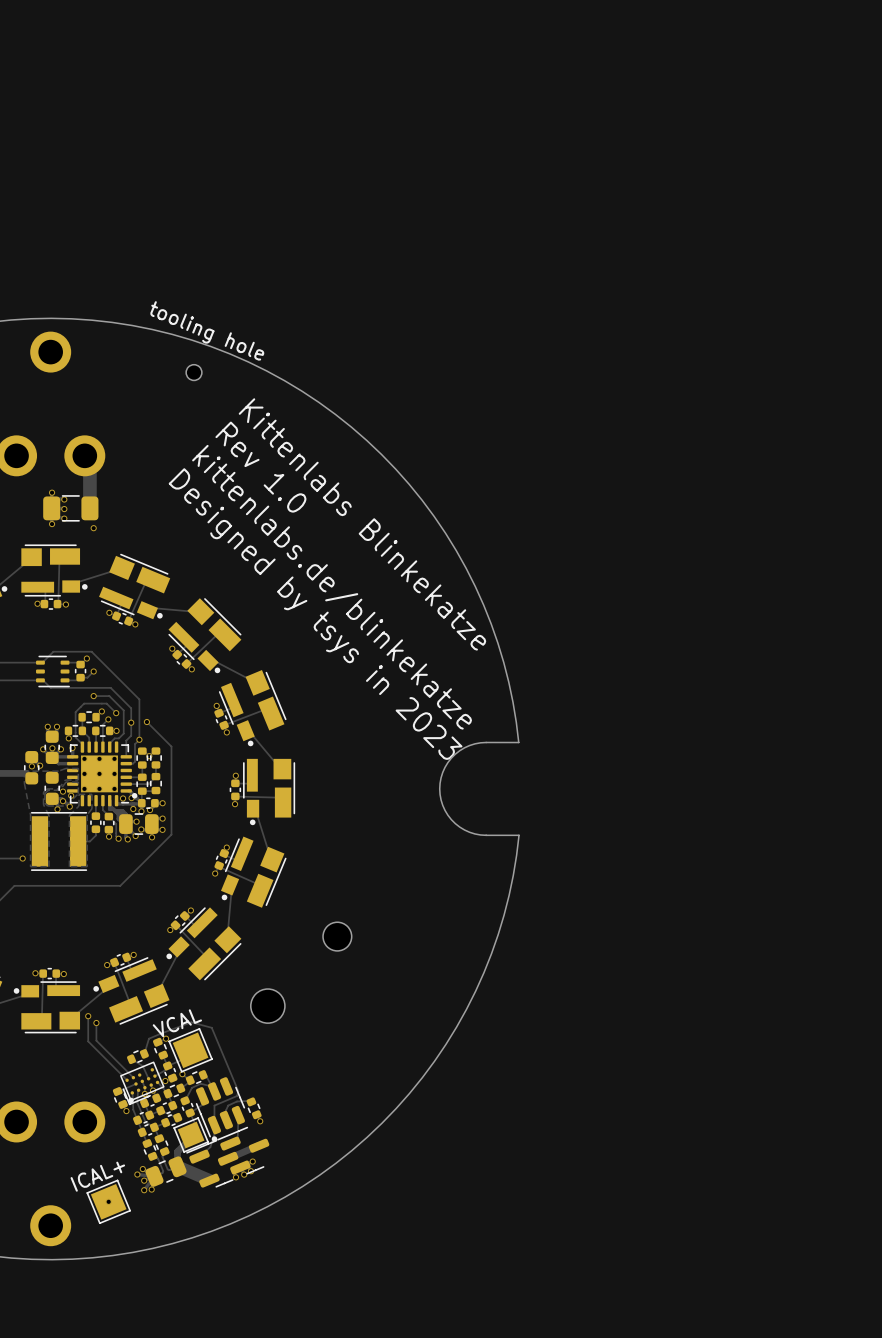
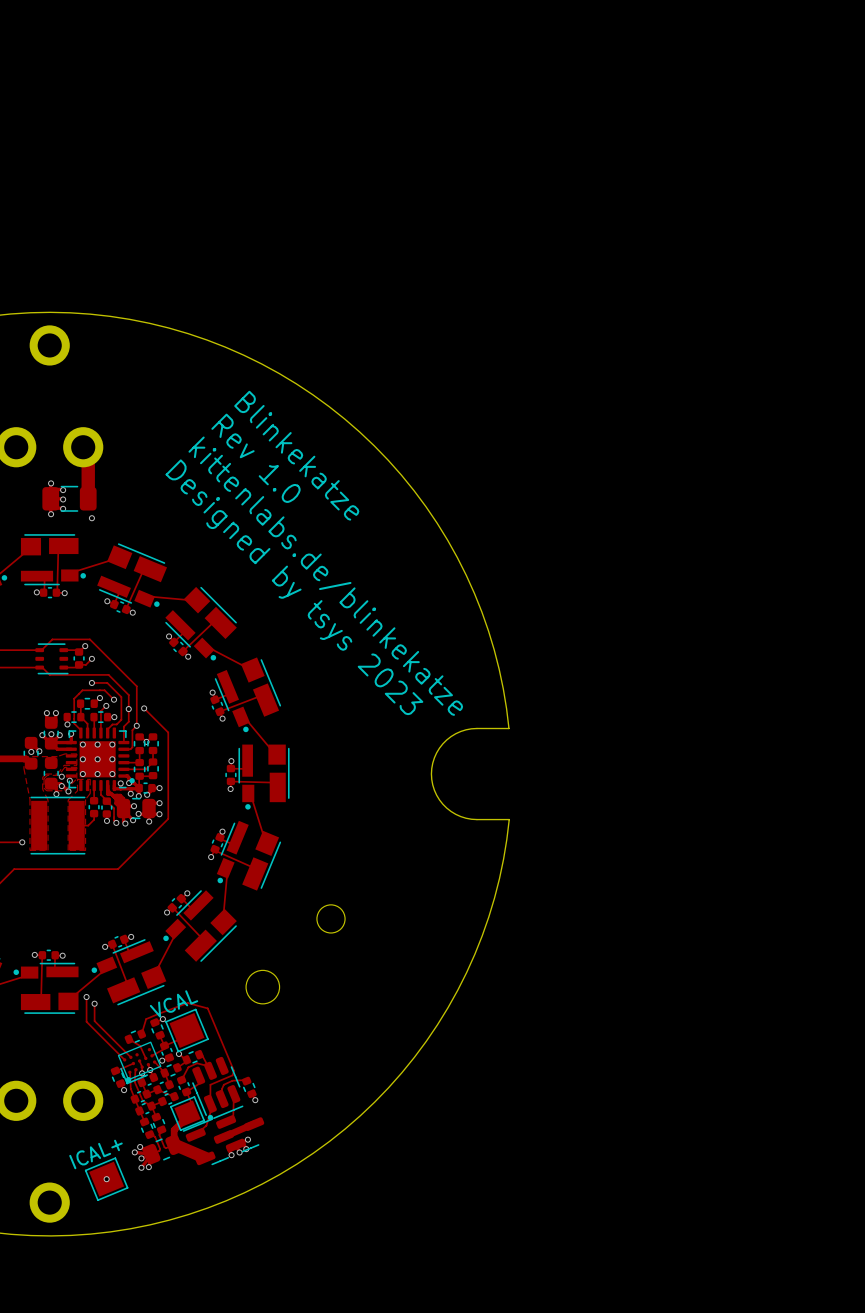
part: (194, 372) -> none
text: Kittenlabs Blinkekatze (362, 524) -> Blinkekatze (296, 455)
text: Designed by tsys in 2023 (315, 614) -> Designed by tsys 2023 (294, 587)

